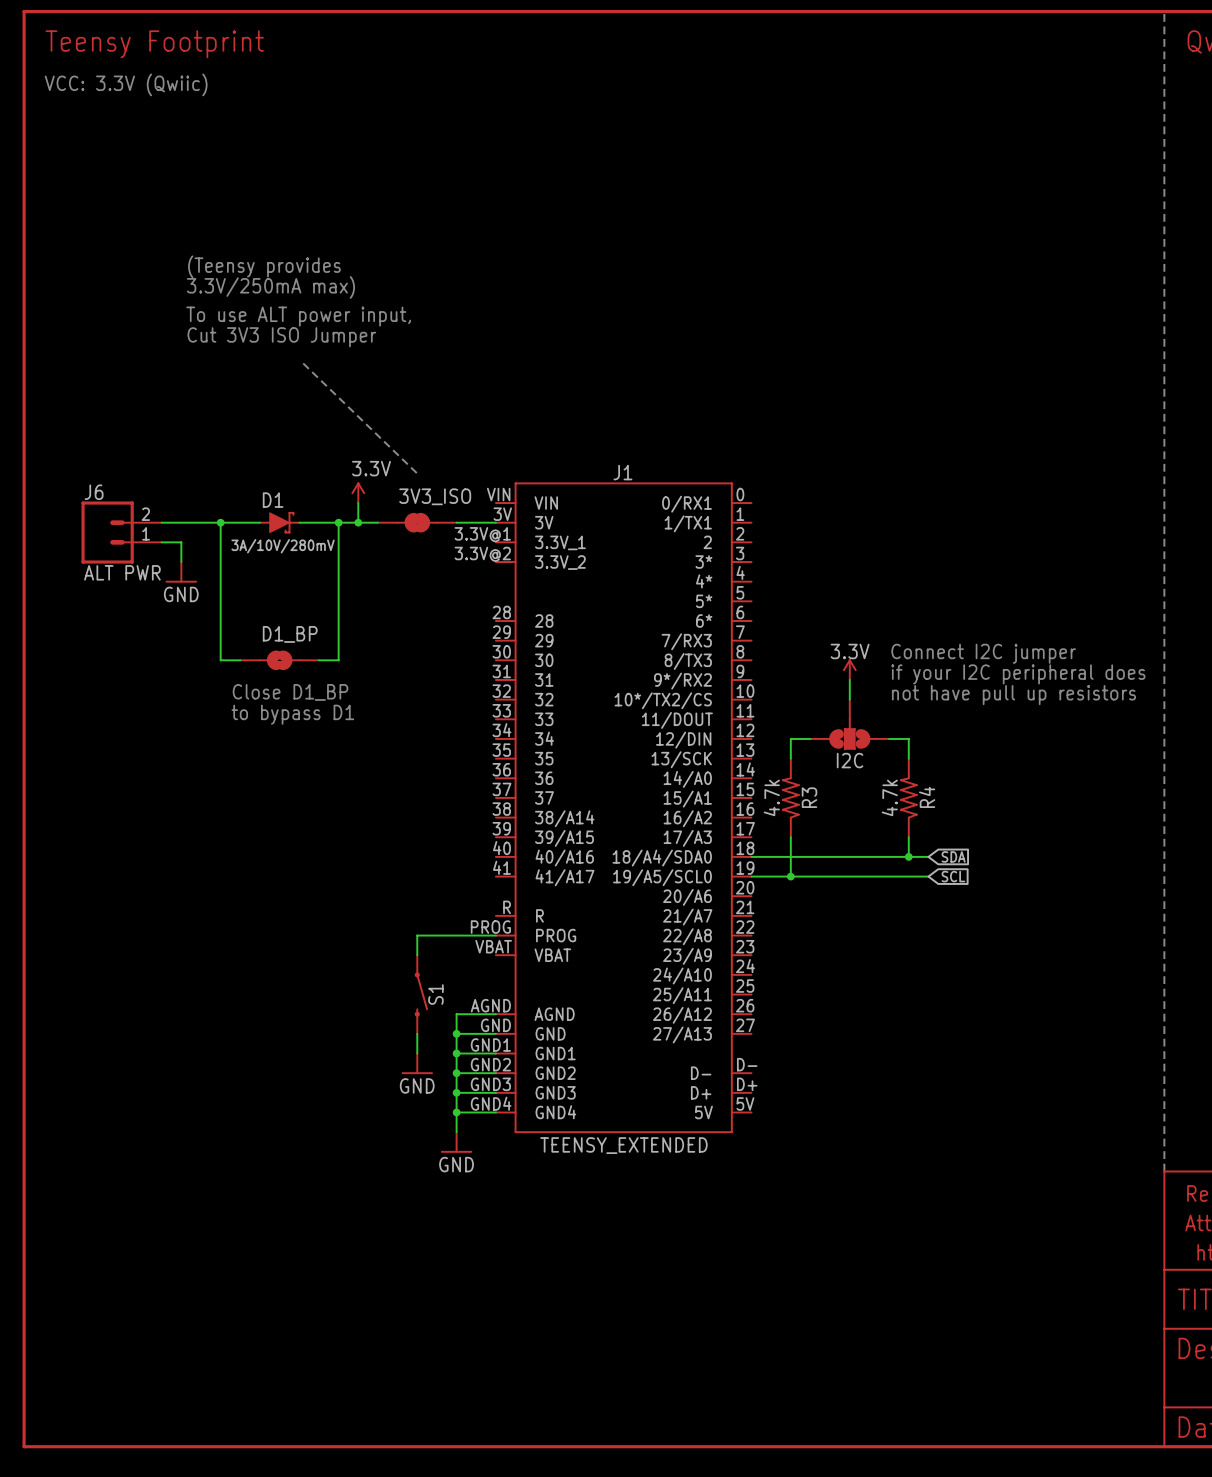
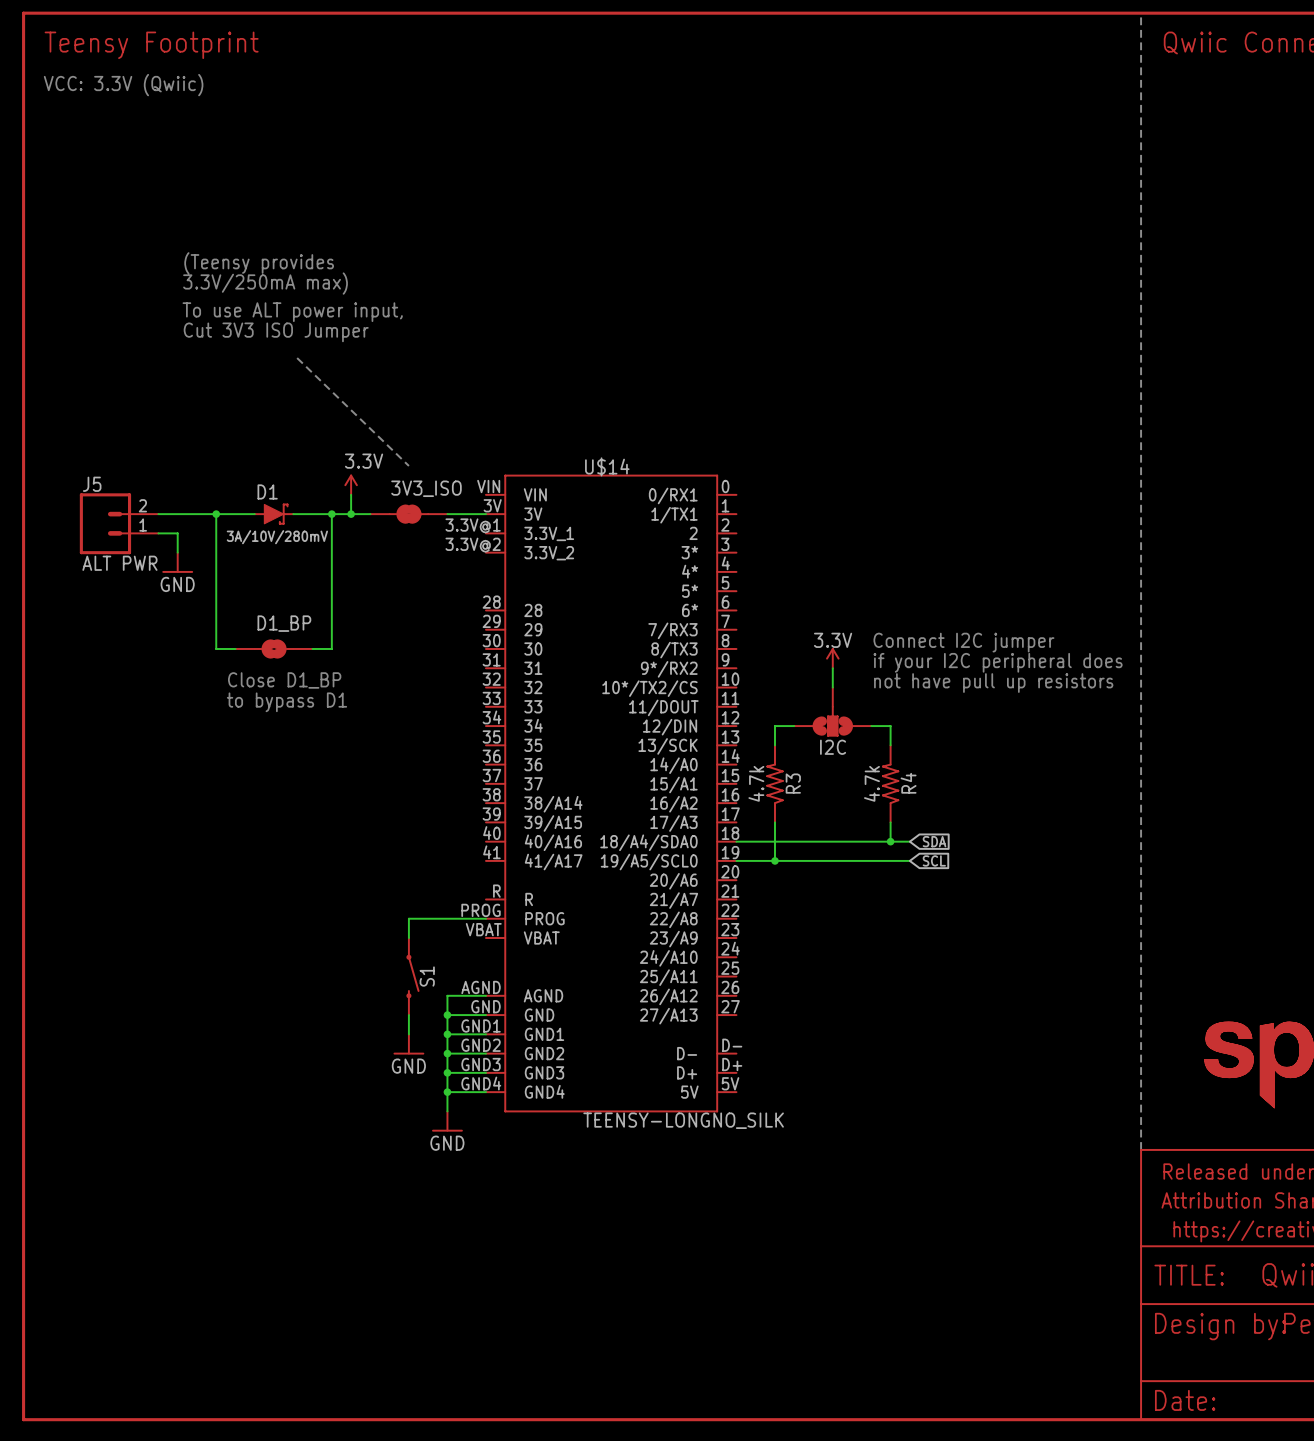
J1 name: J1 (622, 472) -> U$14 (607, 466)
J6 name: J6 (94, 492) -> J5 (92, 484)
J1 value: TEENSY_EXTENDED (623, 1145) -> TEENSY-LONGNO_SILK (683, 1120)

